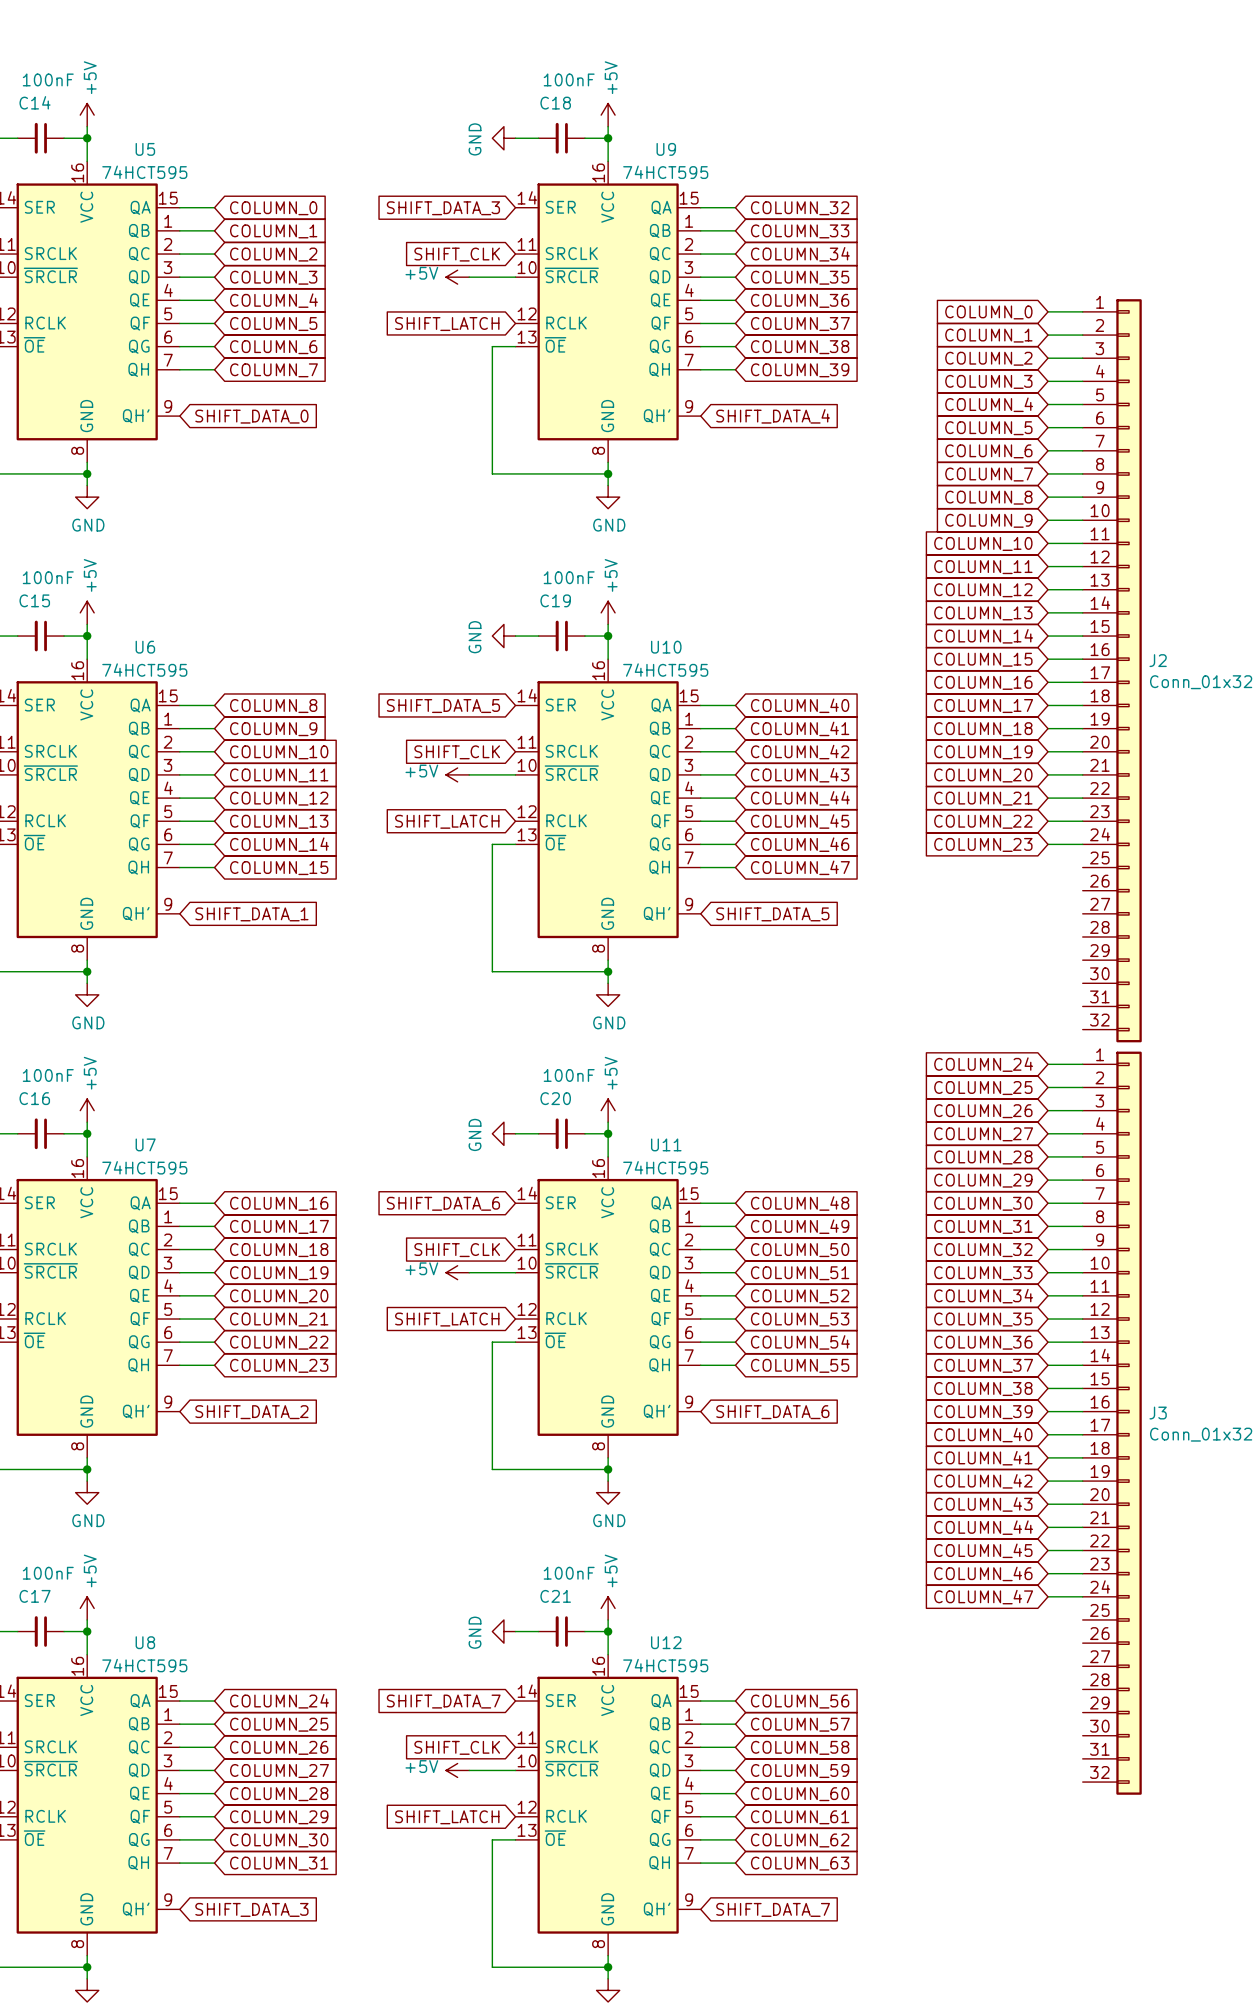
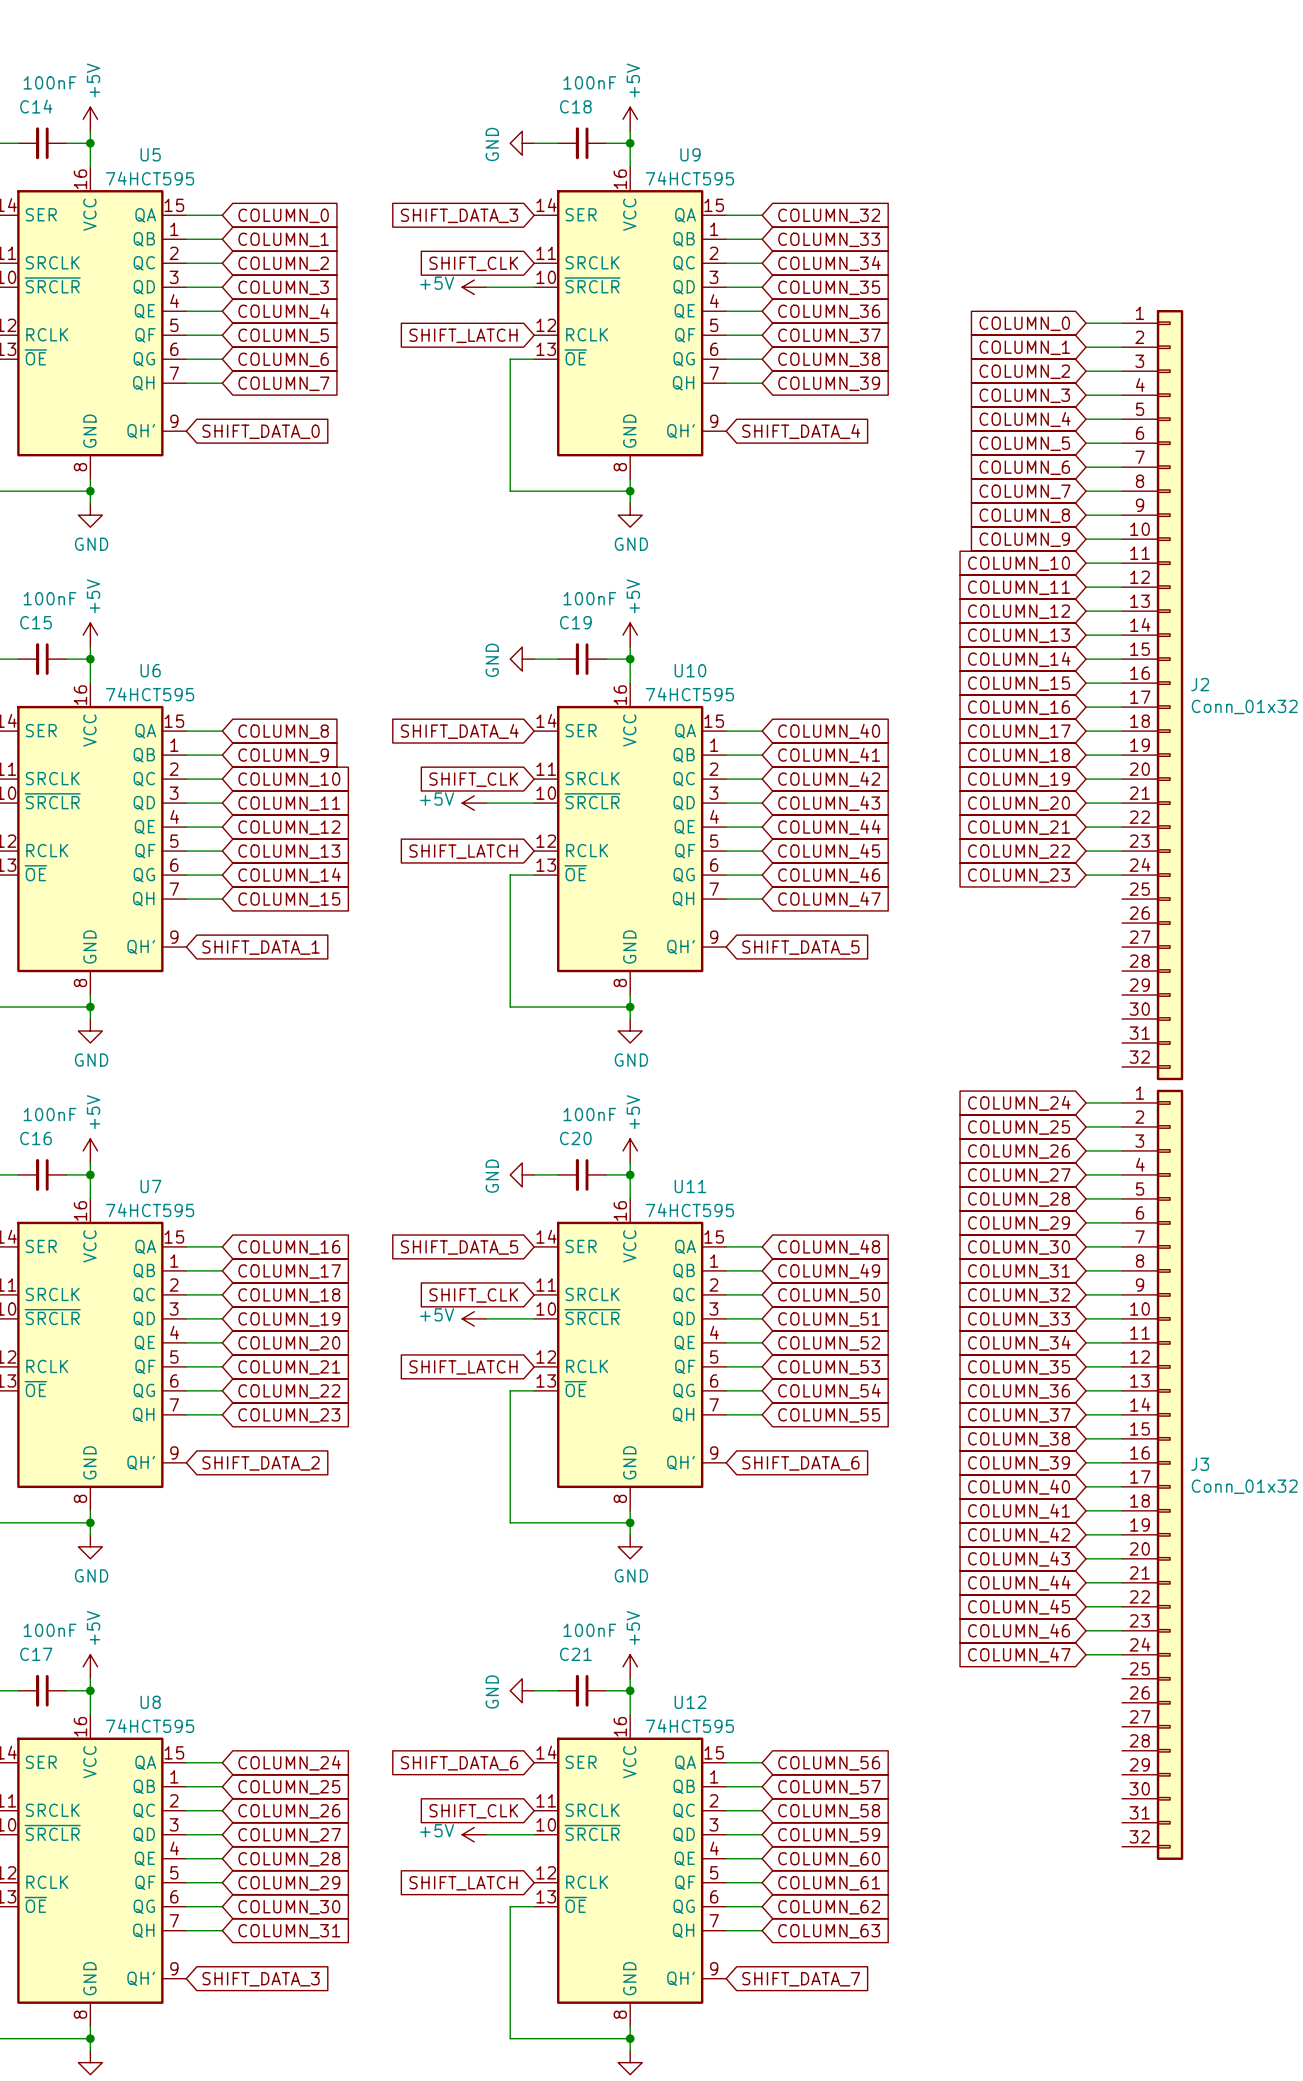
global label: SHIFT_DATA_5 (443, 706) -> SHIFT_DATA_4 (459, 731)
global label: SHIFT_DATA_6 (443, 1203) -> SHIFT_DATA_5 (459, 1247)
global label: SHIFT_DATA_7 (443, 1701) -> SHIFT_DATA_6 (459, 1763)

